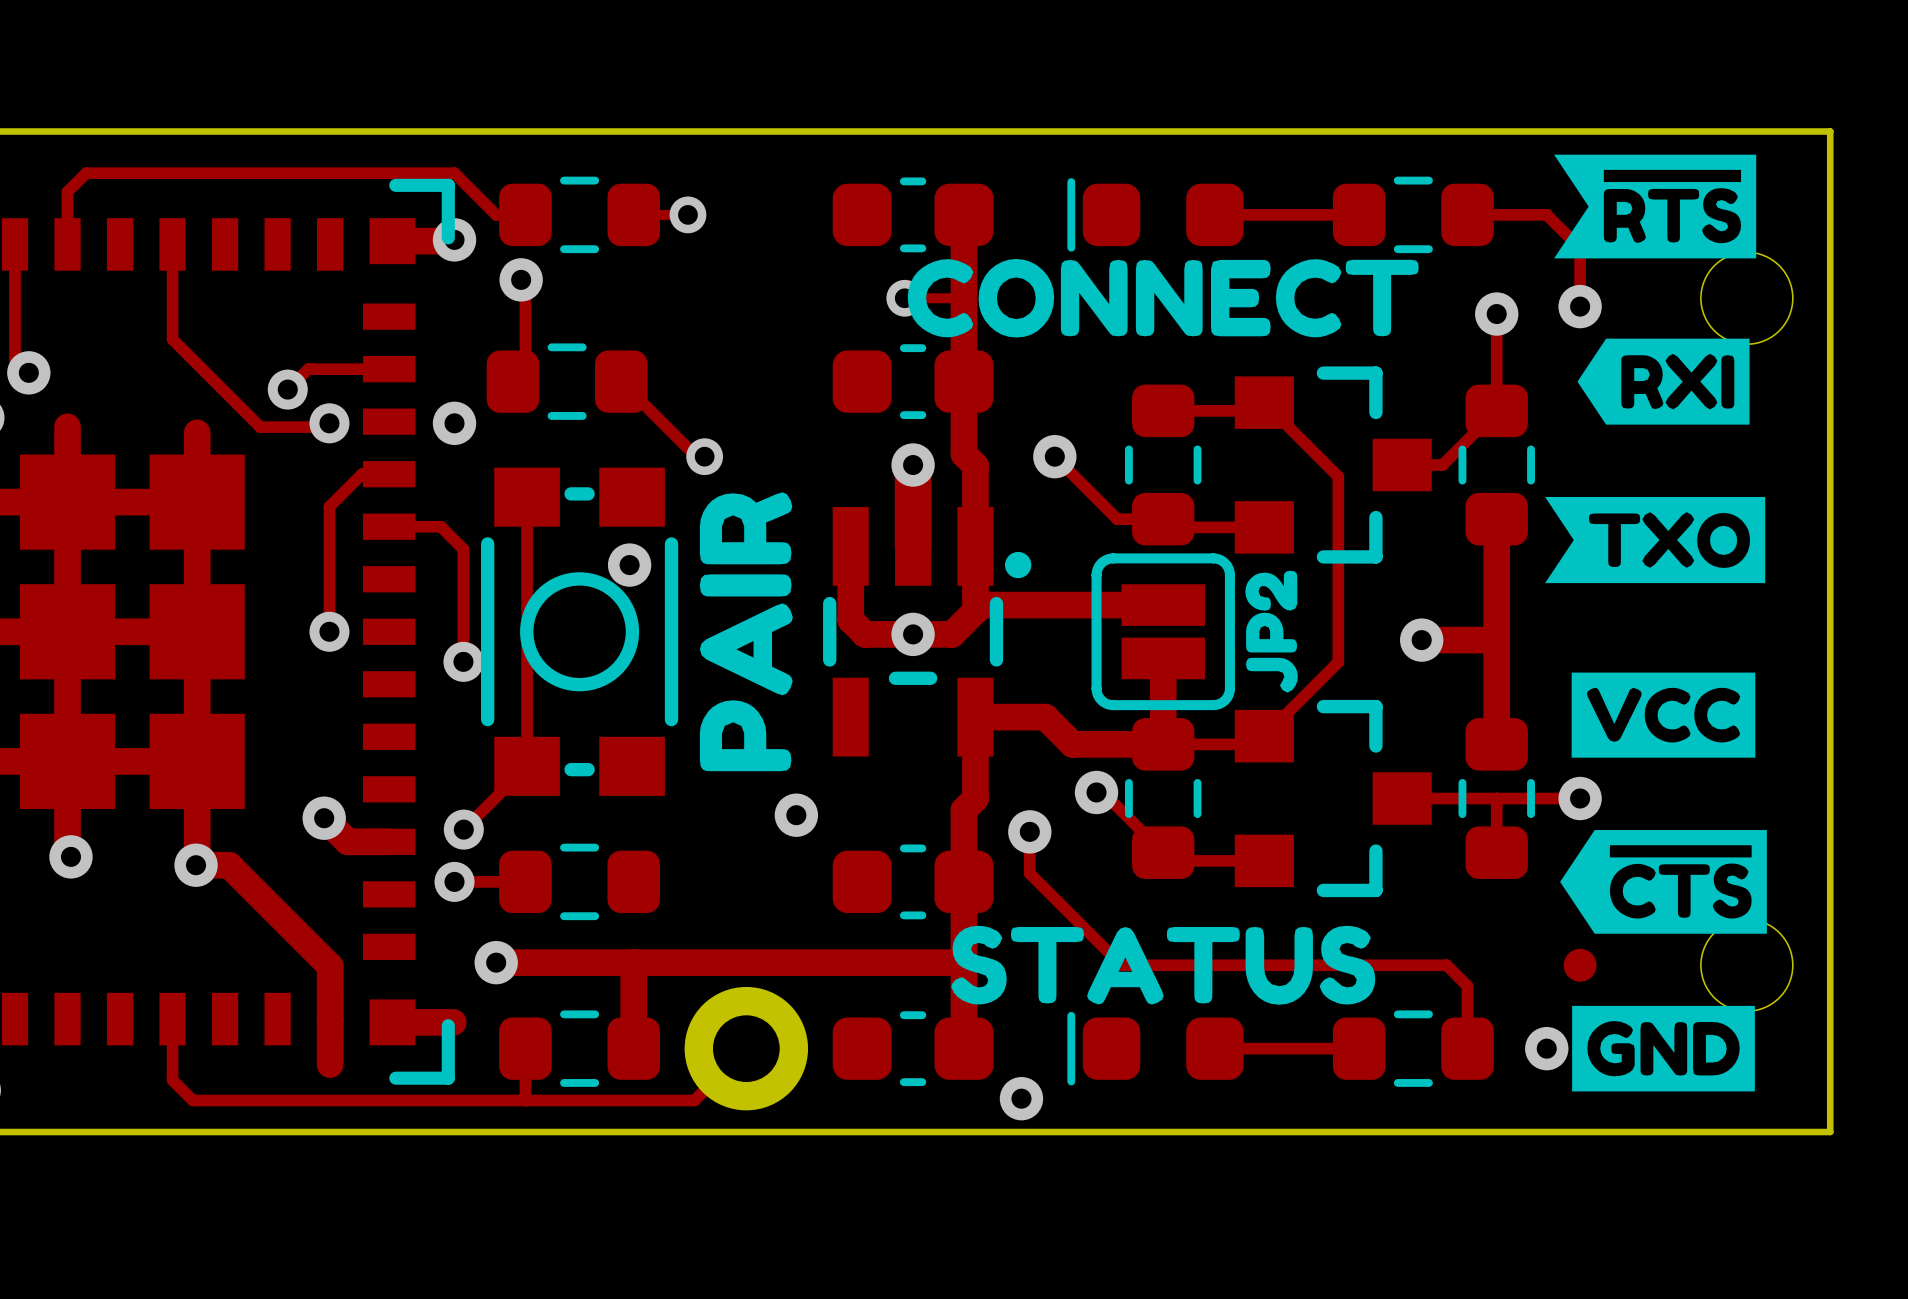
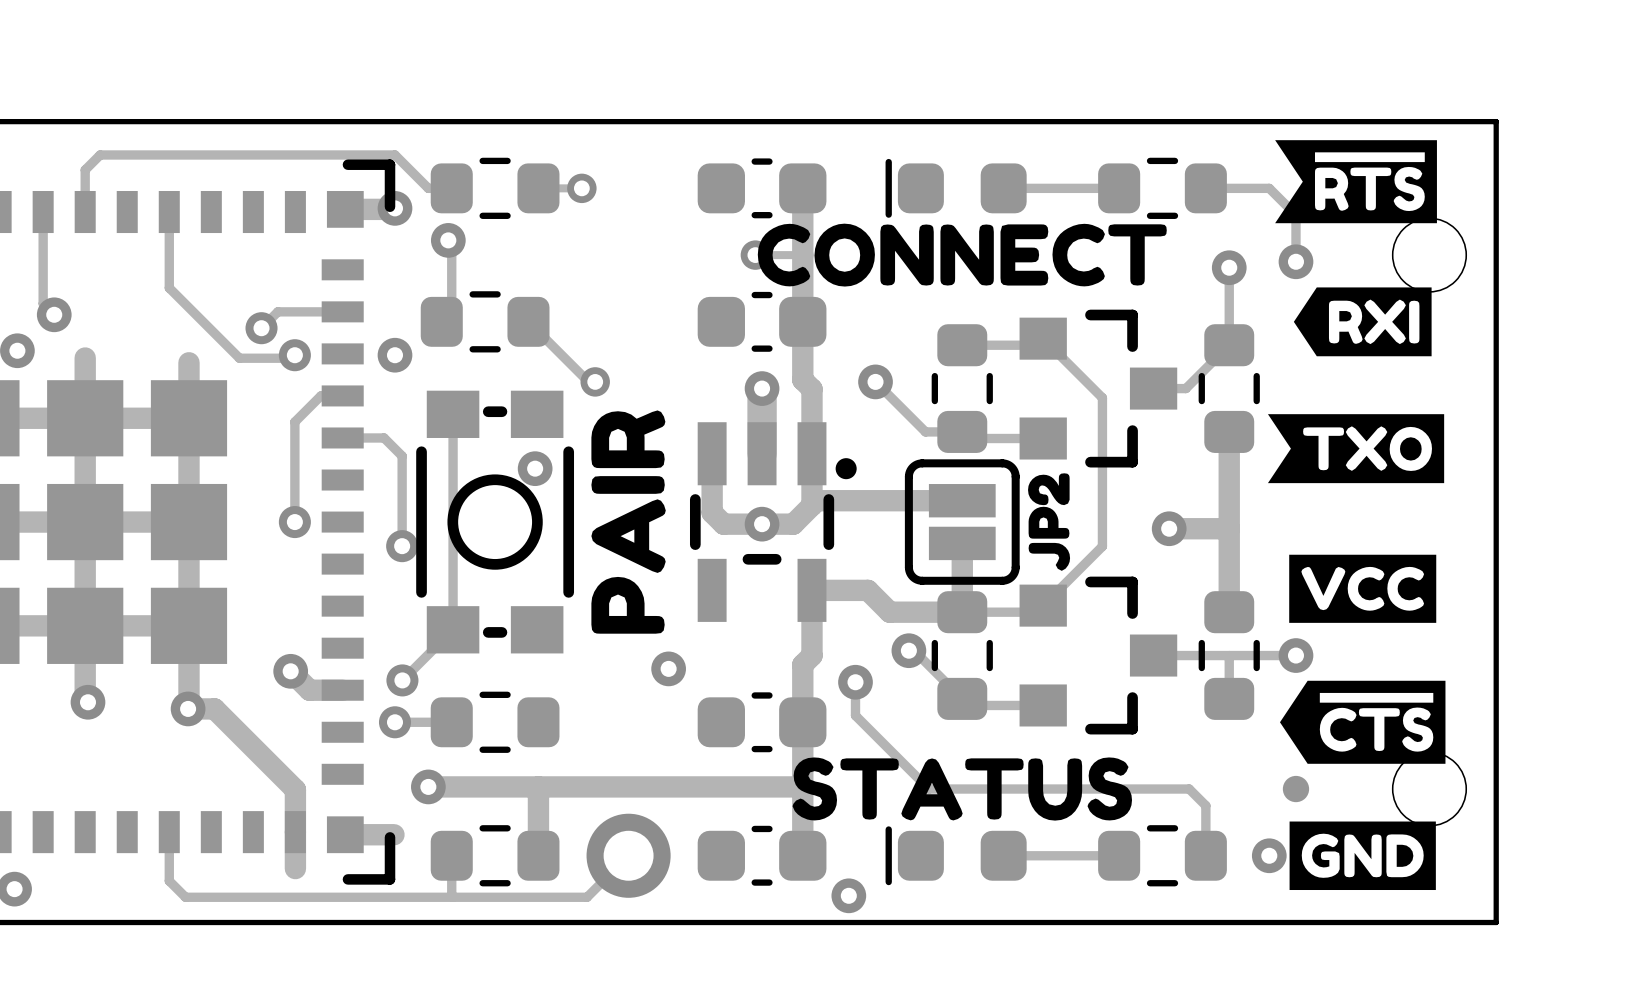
part footprint: [684, 986, 809, 1111] -> [586, 813, 671, 898]

